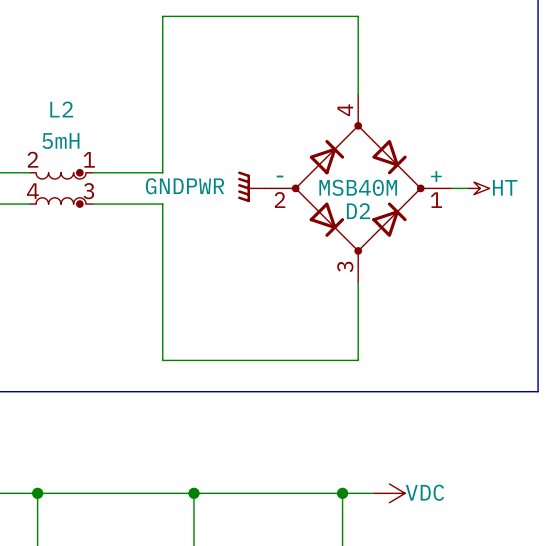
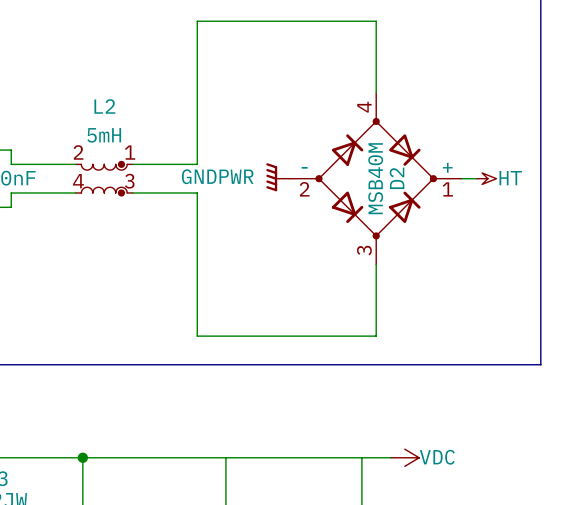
D2 value rotation: 0° (358, 187) -> 90° counterclockwise (375, 178)
D2 name rotation: 0° (358, 211) -> 90° counterclockwise (397, 178)
junction: (194, 493) -> none
junction: (342, 493) -> none

